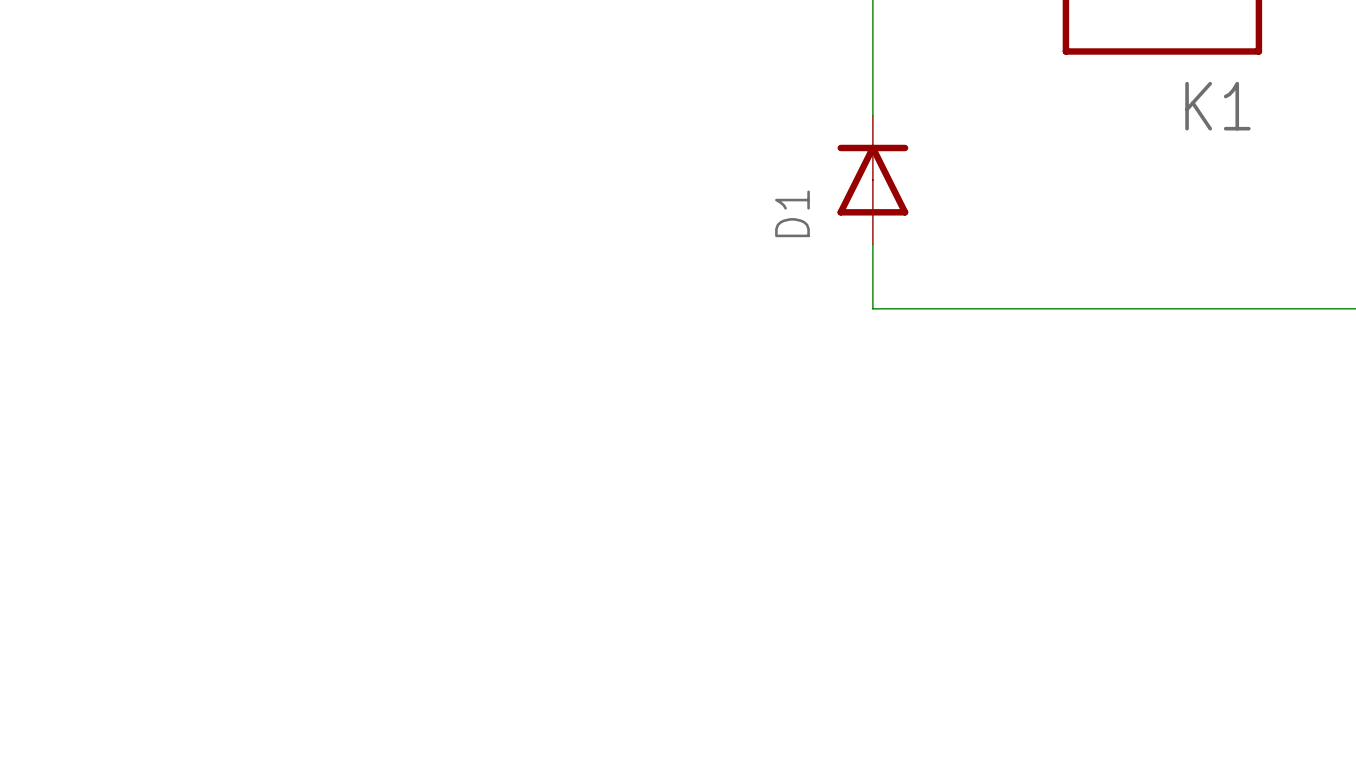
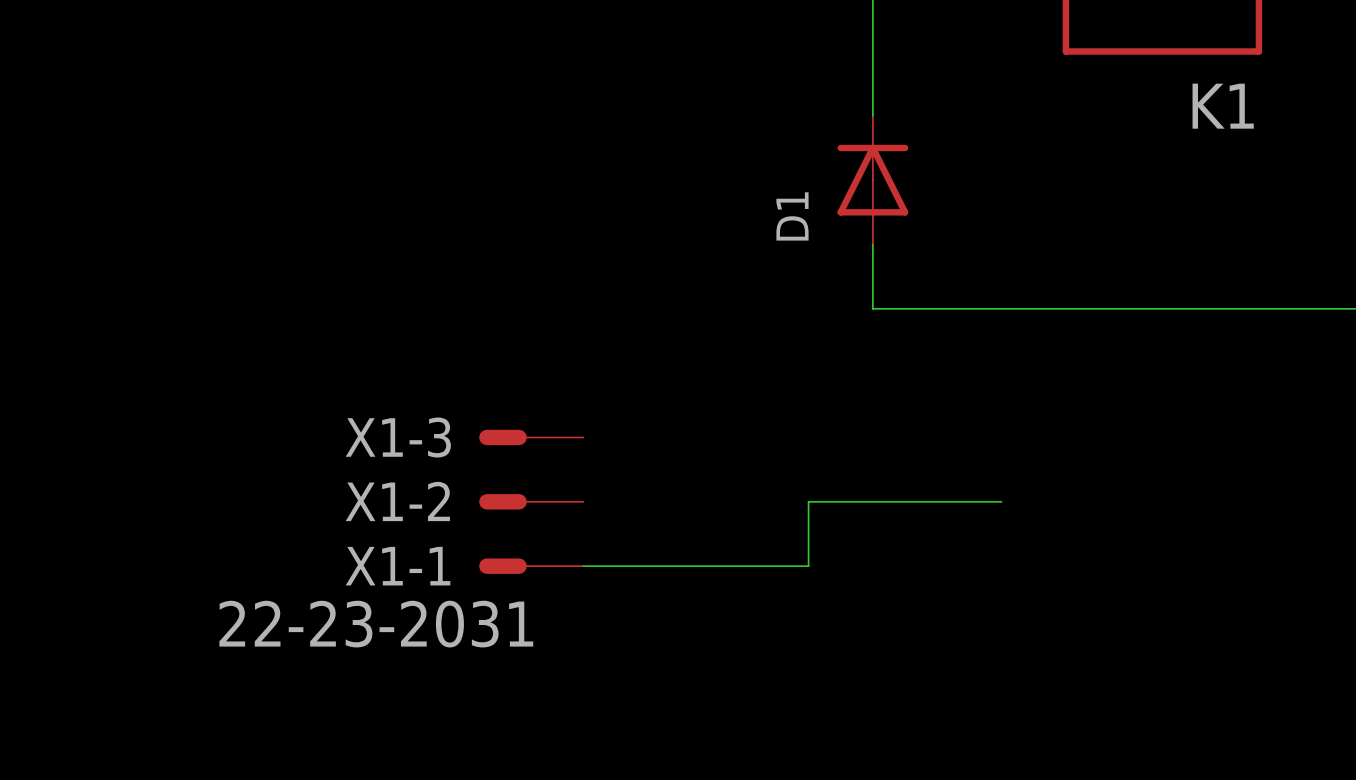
X1-3: none -> (531, 437)
X1-2: none -> (531, 501)
wire: none -> (1001, 501) (808, 501) (808, 566) (583, 566)
X1-1: none -> 22-23-2031 (531, 566)

